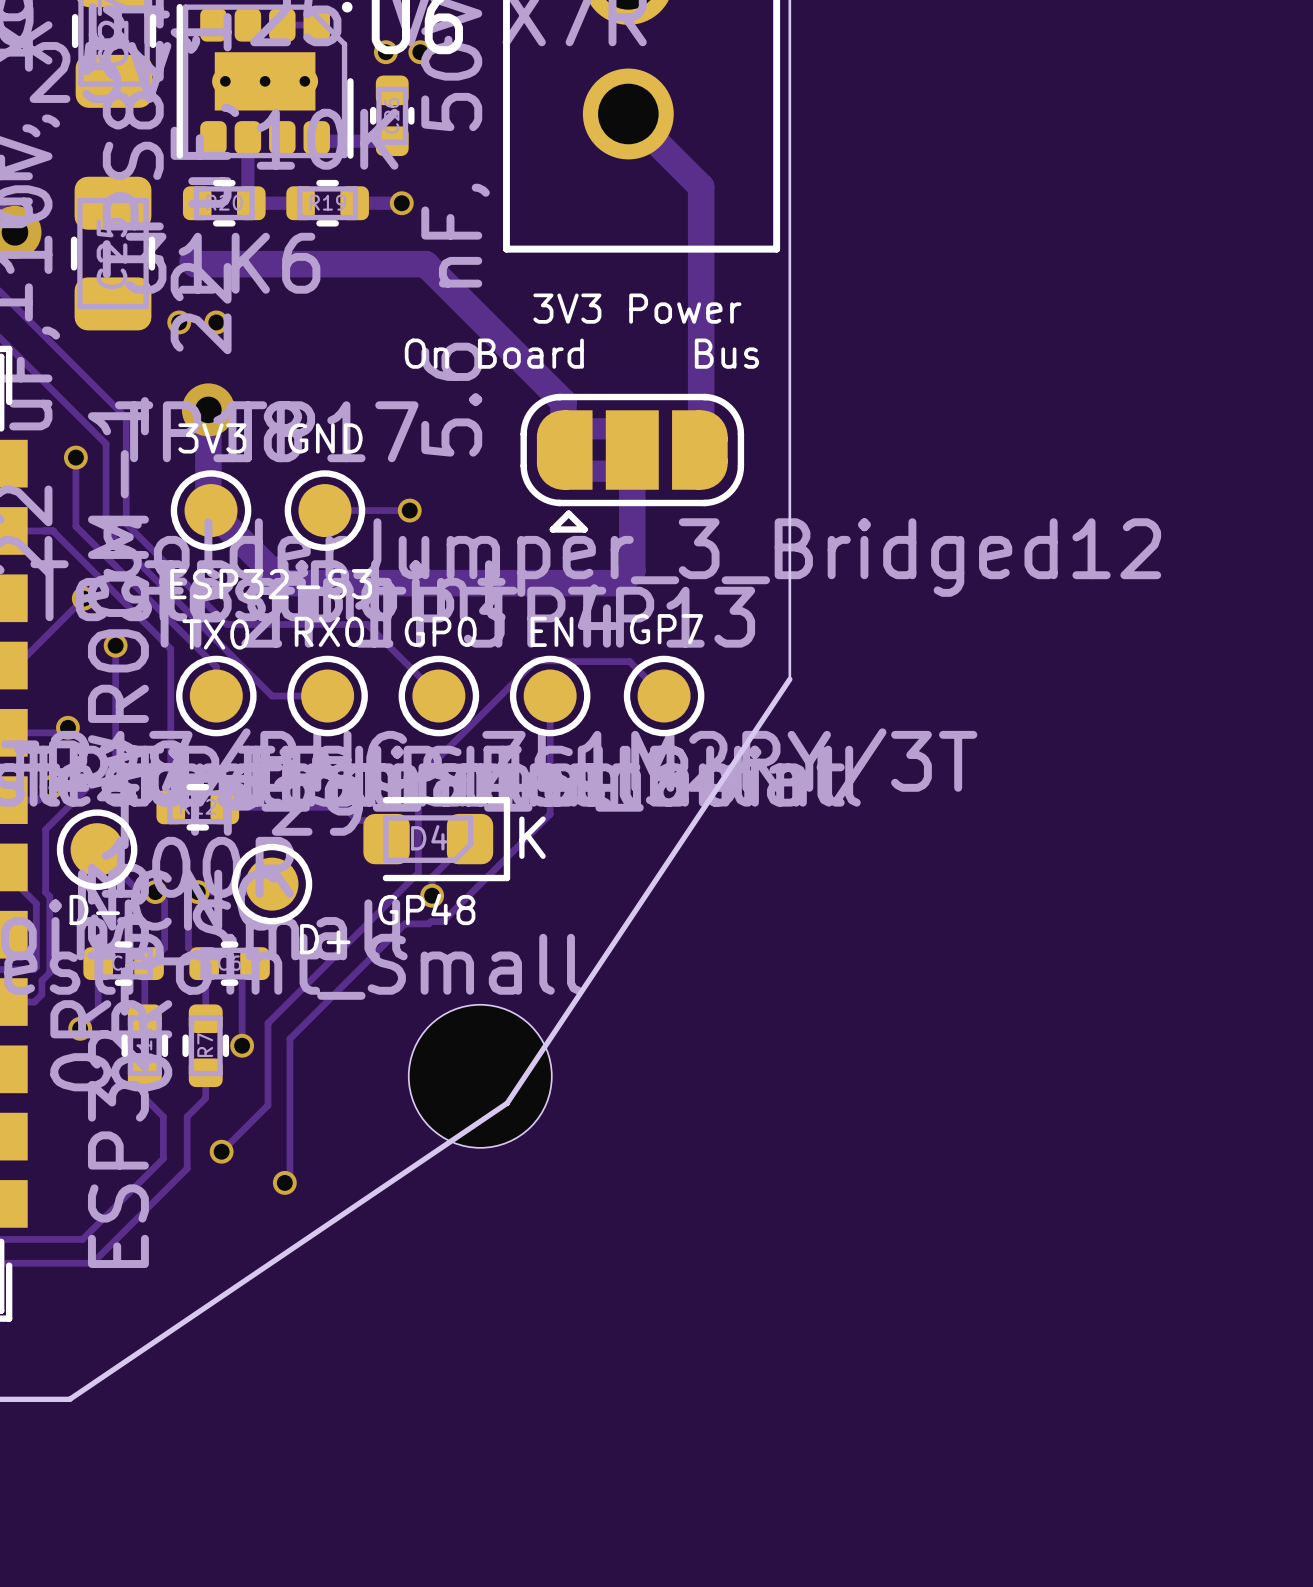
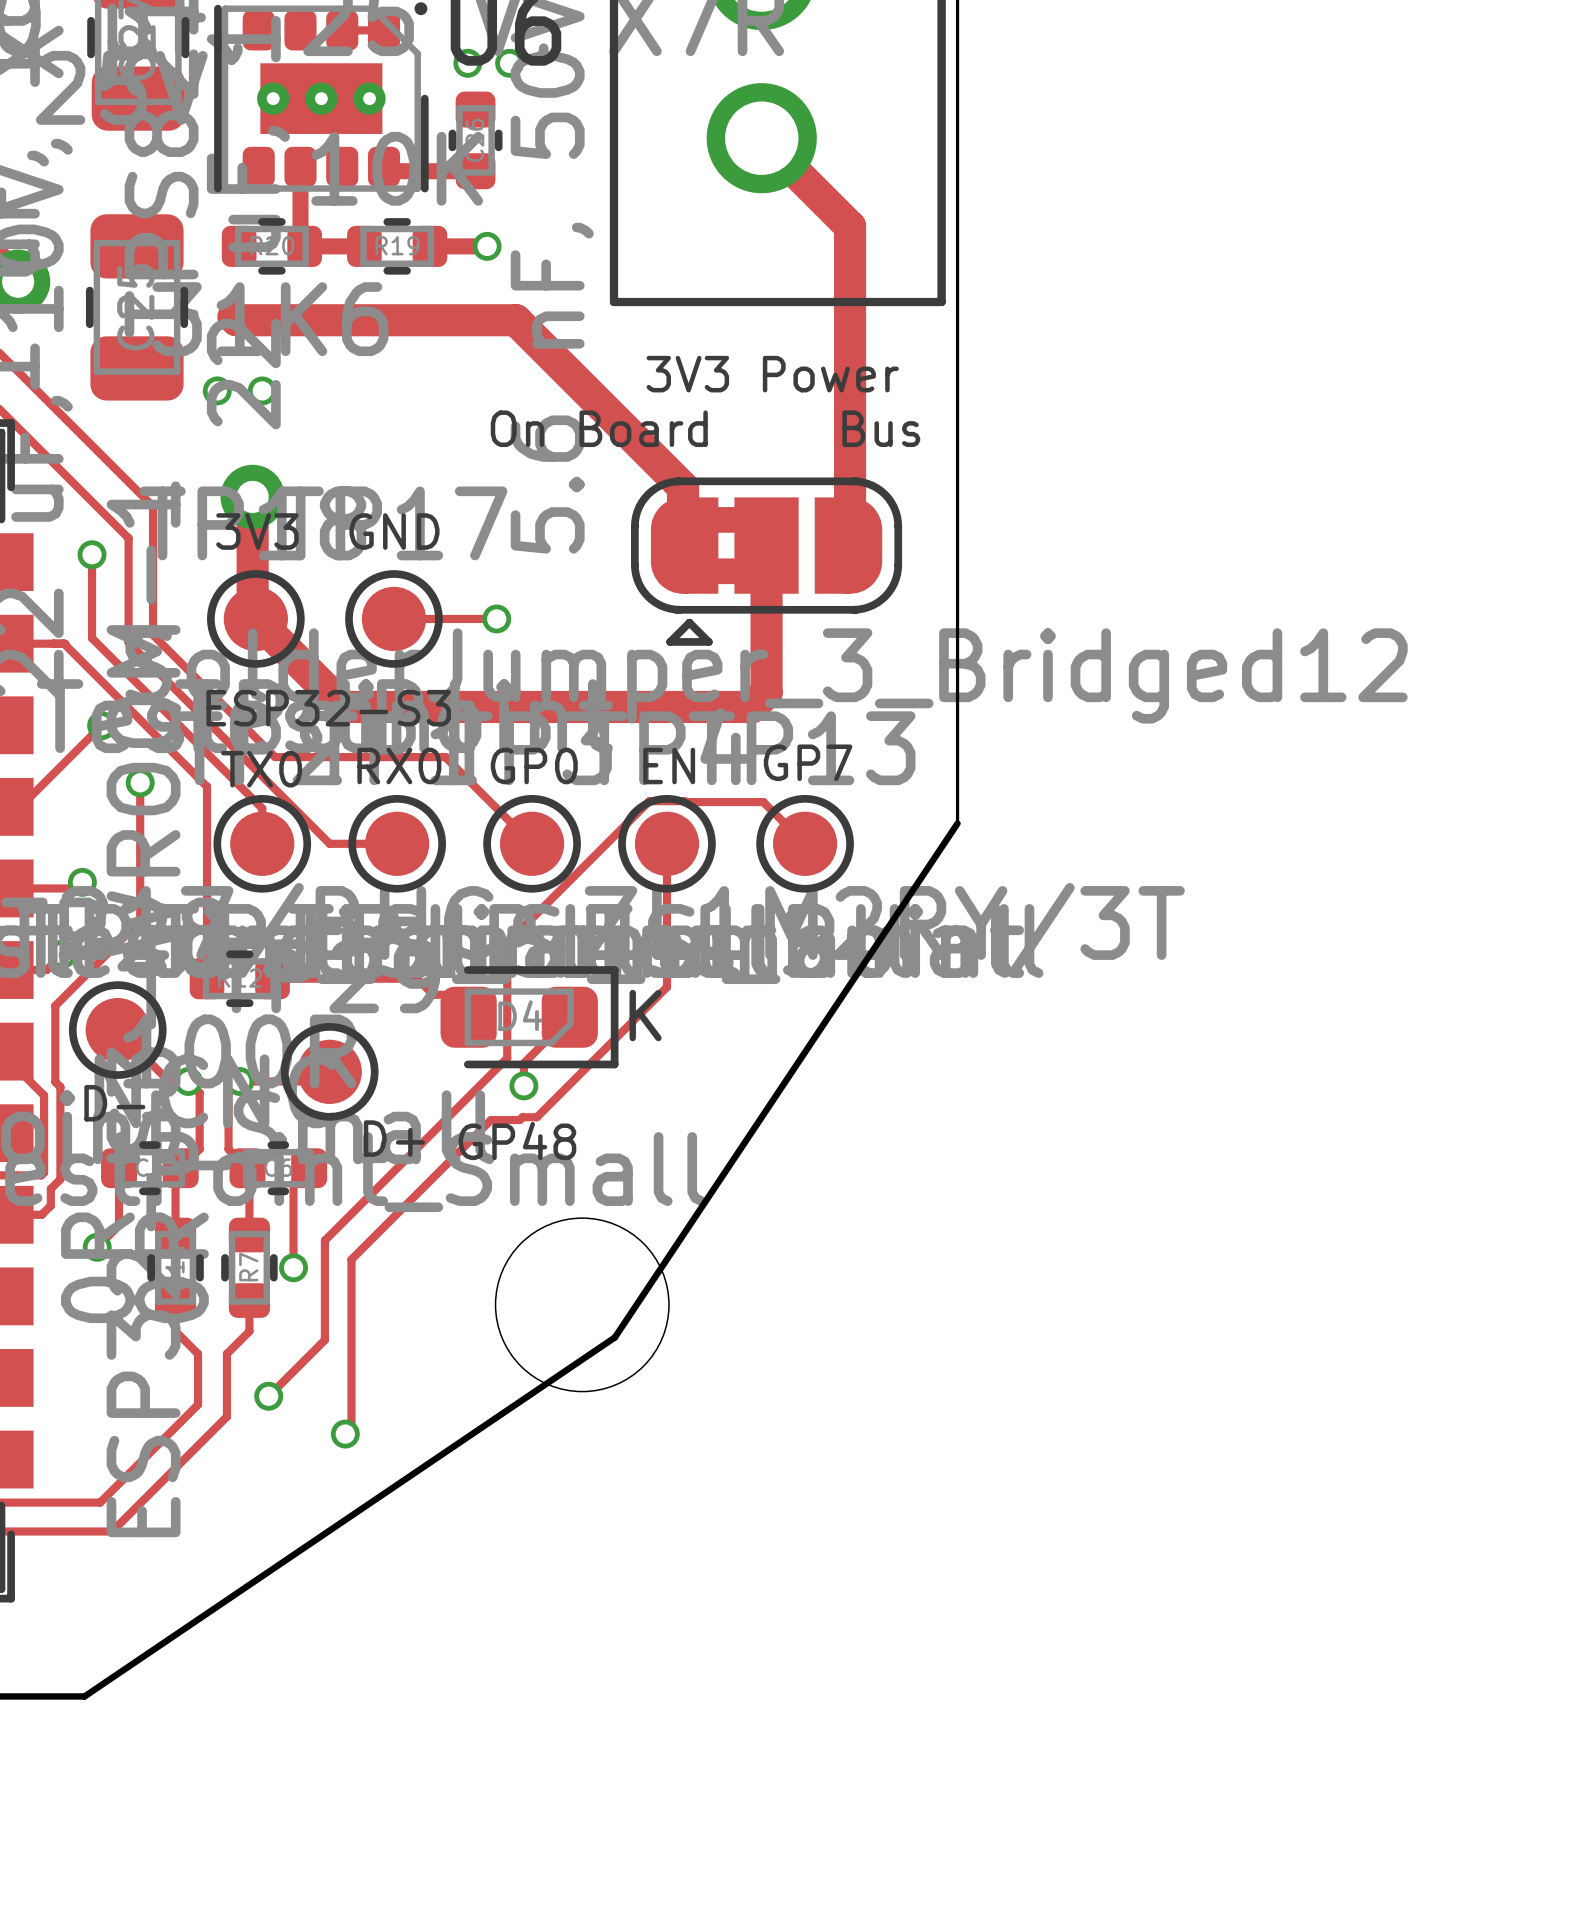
text position: GP48 (426, 909) -> GP48 (517, 1141)

